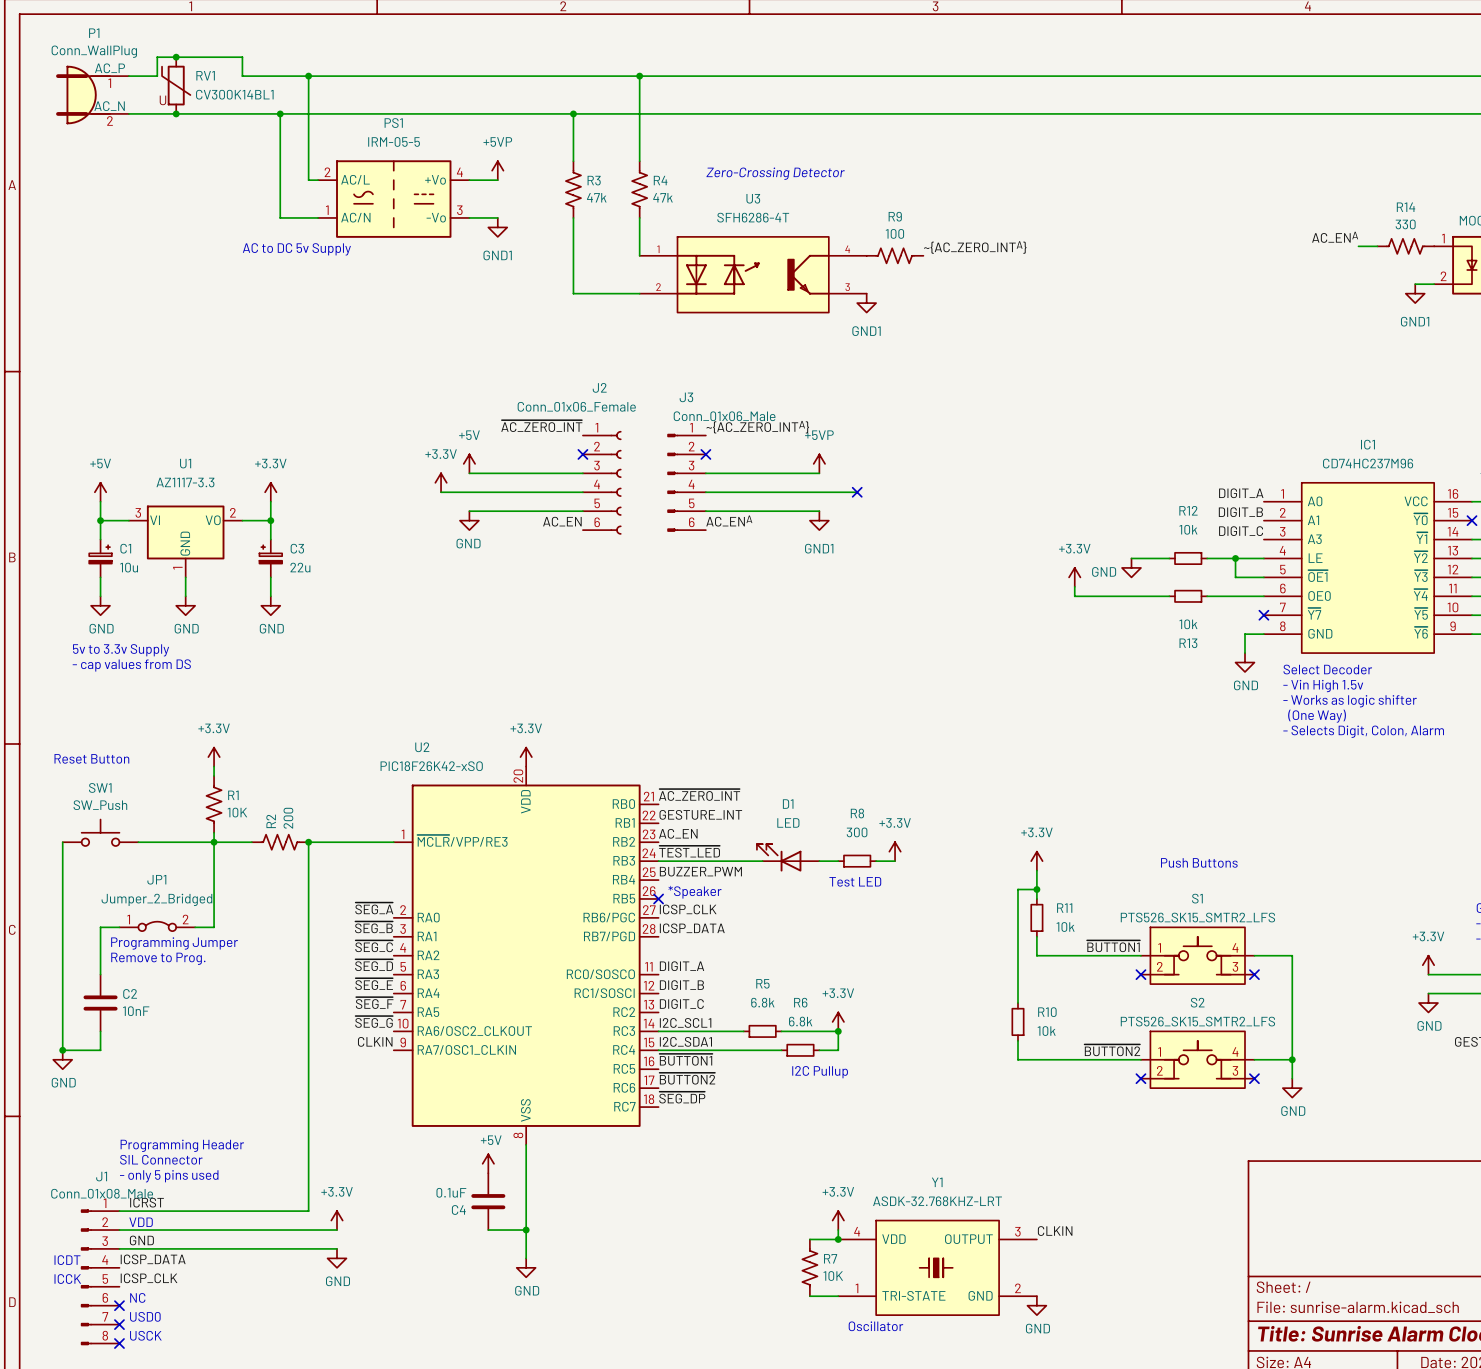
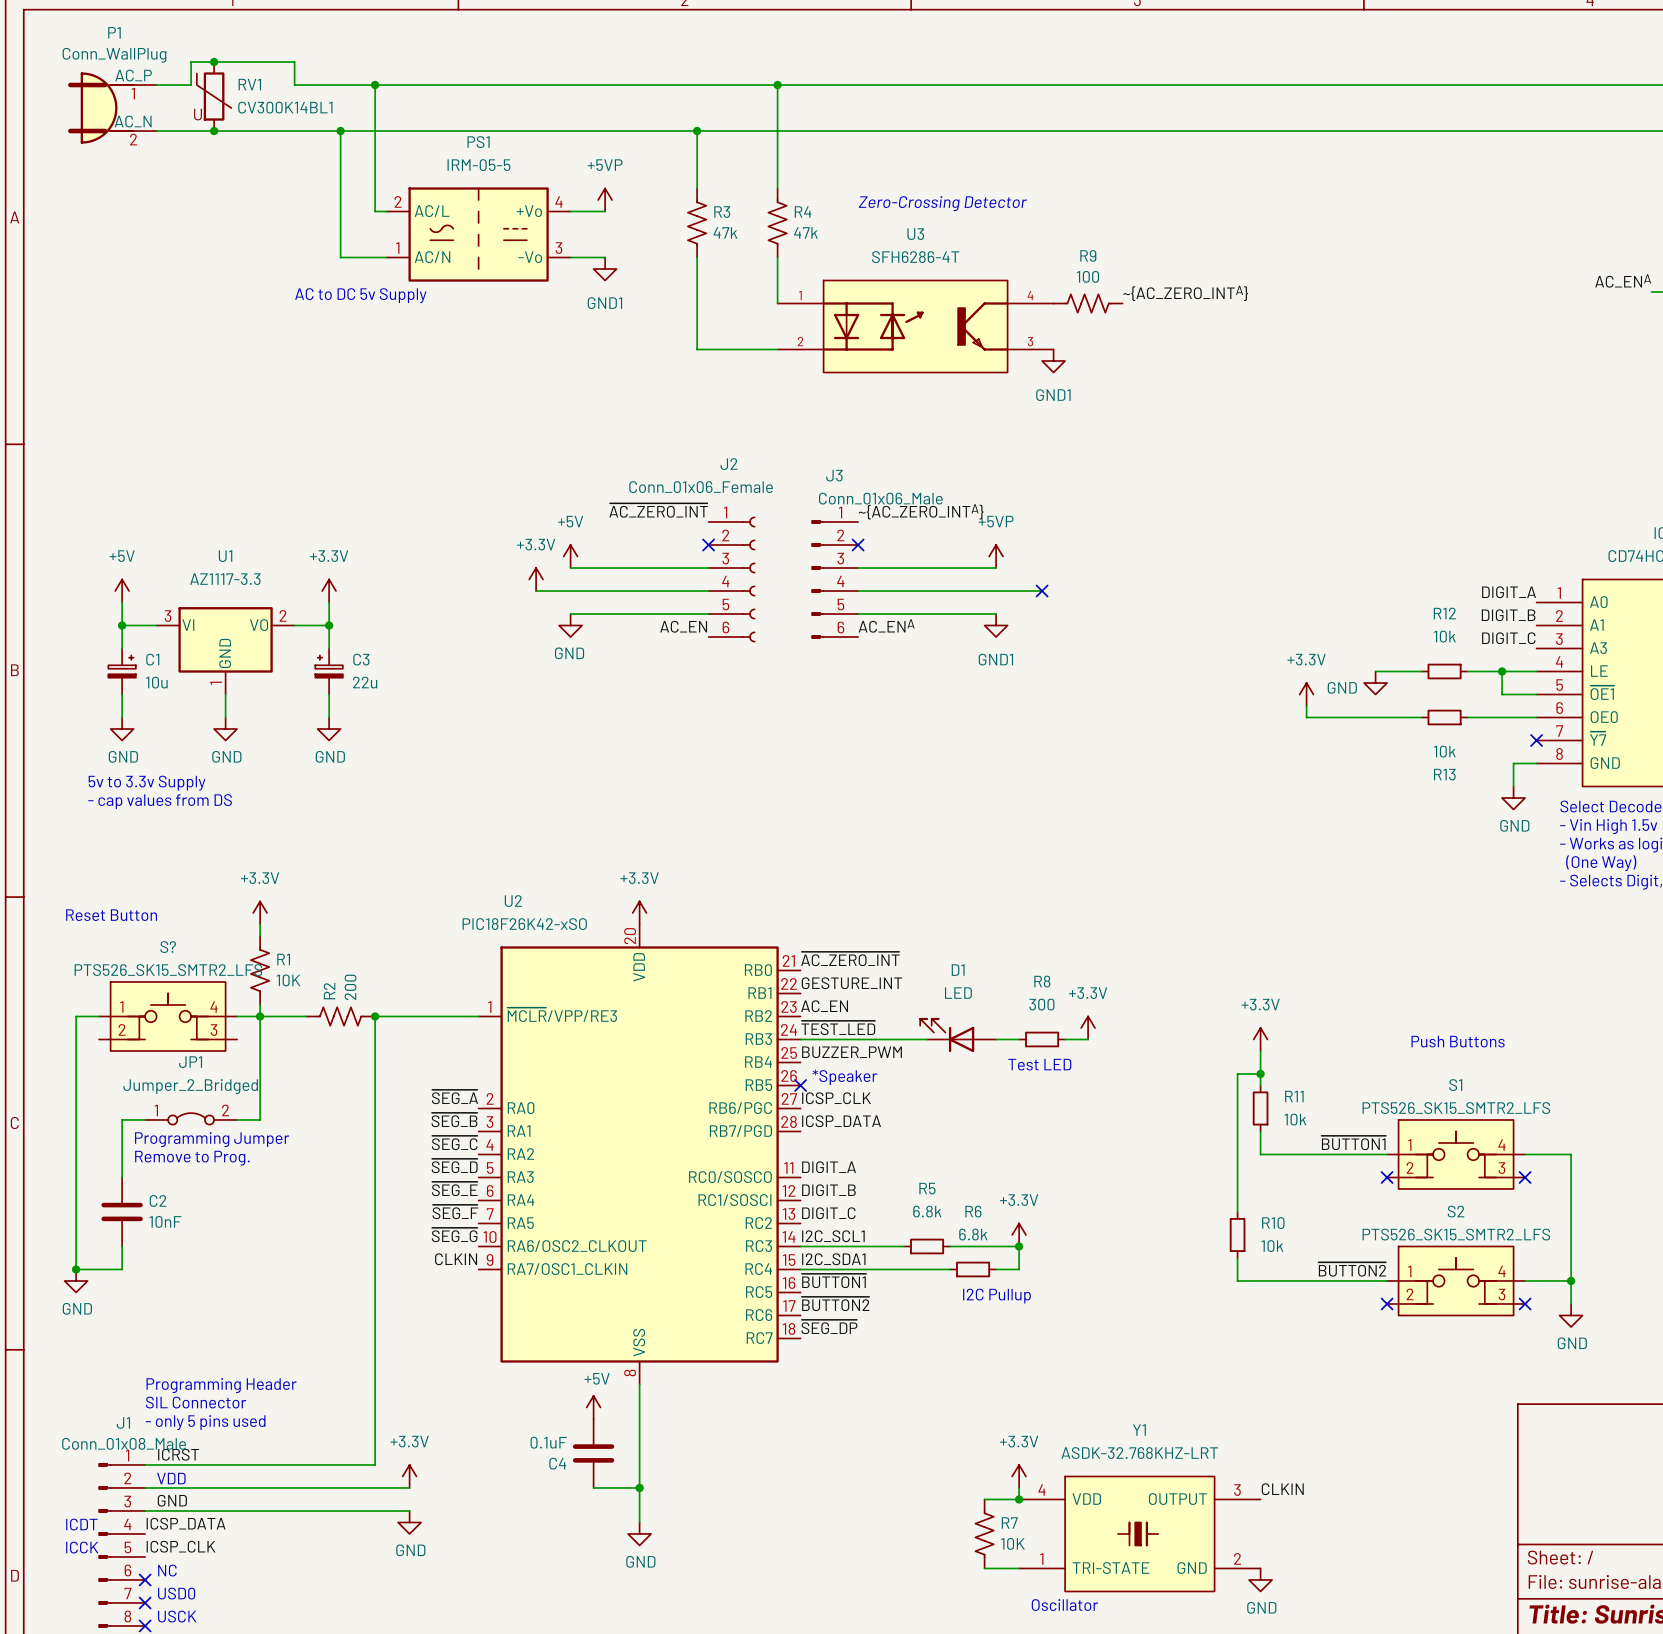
SW1: SW_Push (100, 832) -> none
S?: none -> PTS526_SK15_SMTR2_LFS (168, 1016)

